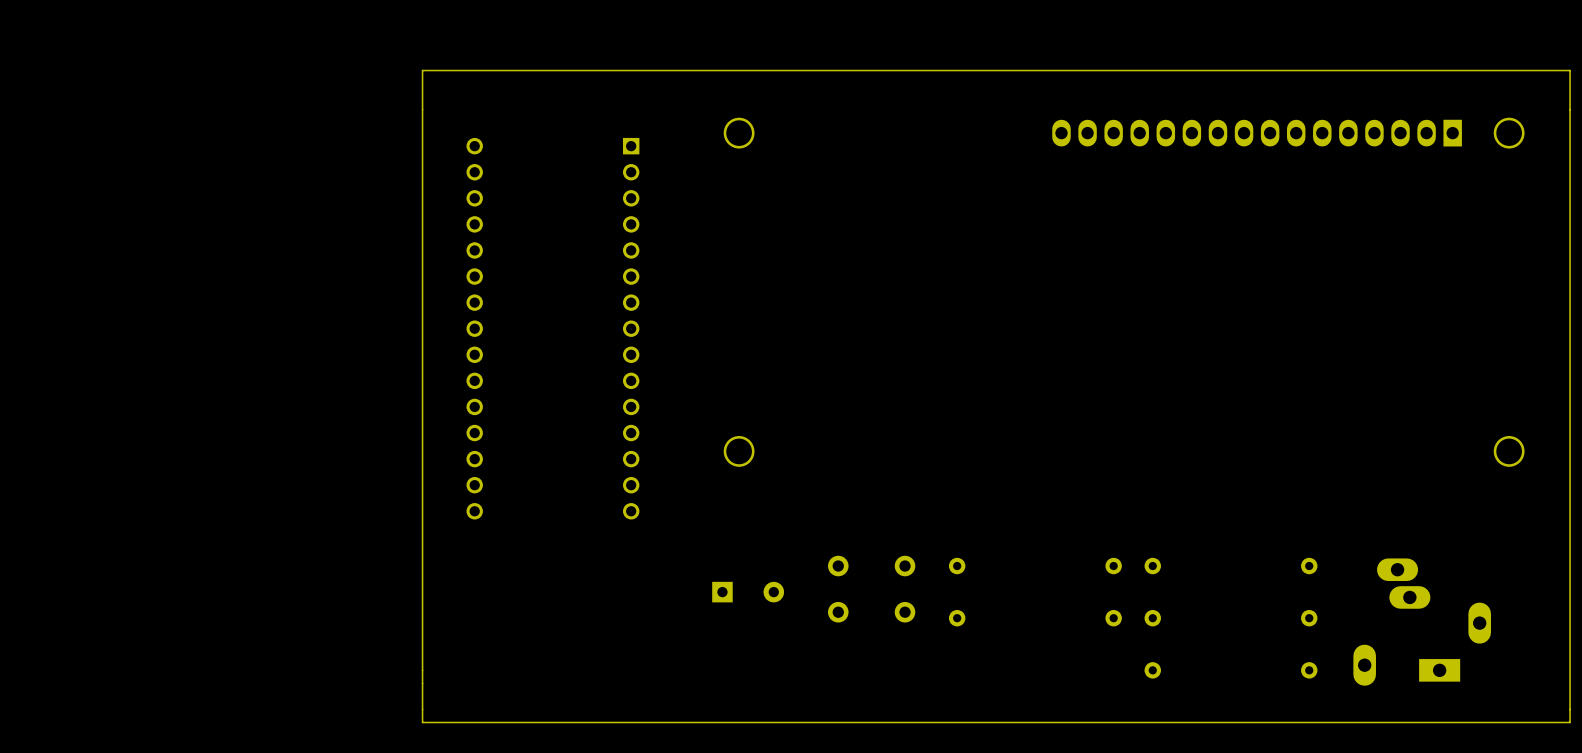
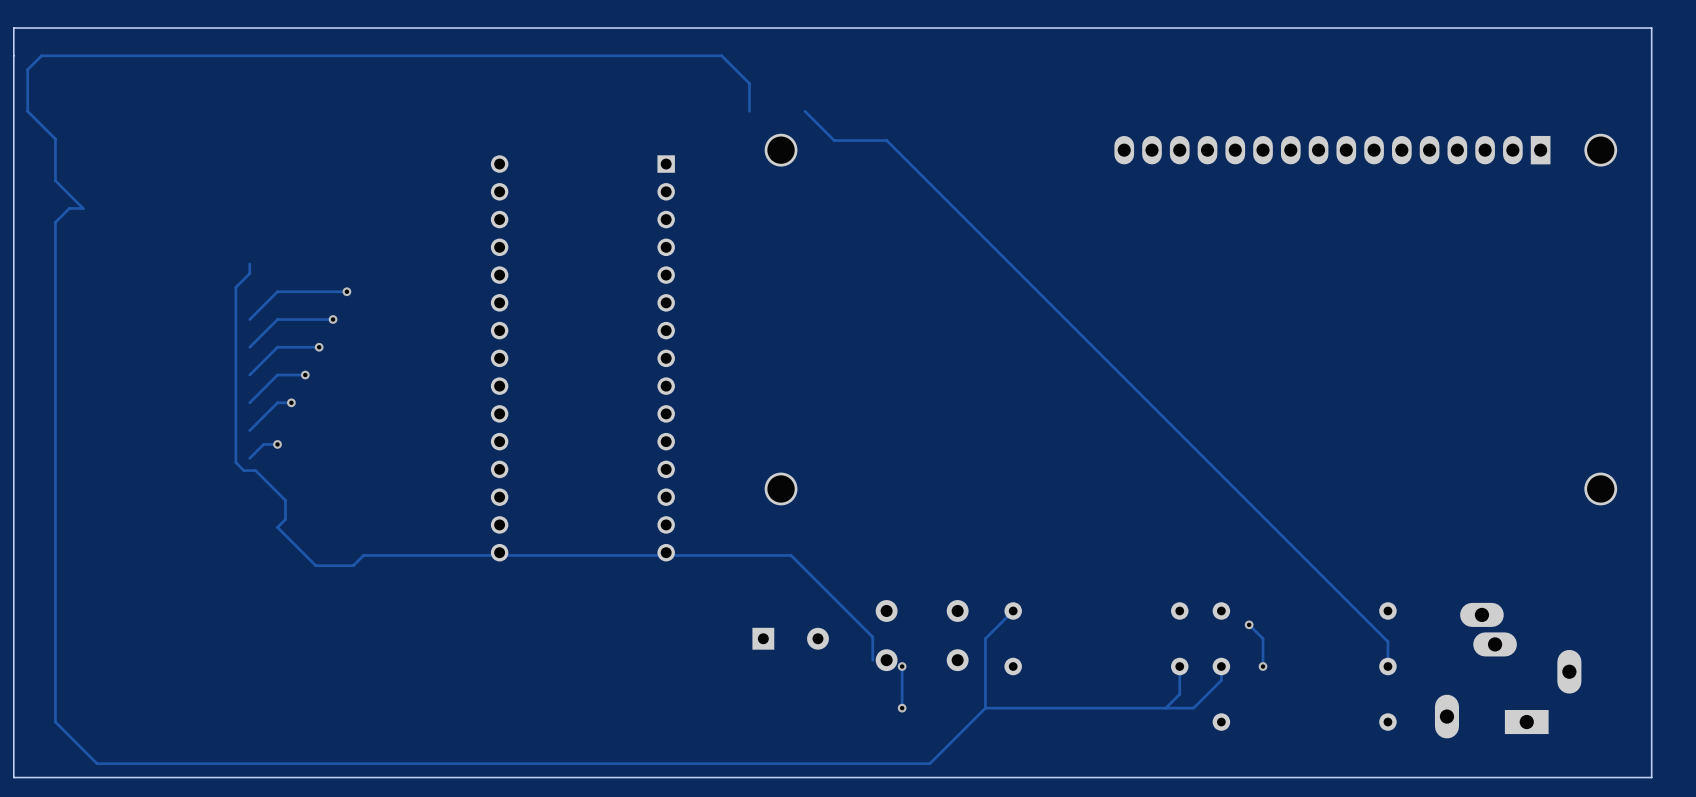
track: none -> (749, 111) (749, 83) (721, 55) (41, 55) (27, 69) (27, 111) (55, 139) (55, 180) (83, 208) (69, 208) (55, 222) (55, 722) (97, 763) (929, 763) (985, 708)
track: none -> (804, 111) (834, 140) (886, 140) (1387, 641) (1387, 666)
track: none -> (249, 263) (249, 273) (235, 287) (235, 462) (243, 470) (255, 470) (285, 500) (285, 519) (277, 527) (315, 565) (353, 565) (363, 555) (791, 555) (872, 637) (872, 660)
track: none -> (346, 291) (277, 291) (249, 319)
via: none -> (346, 291)
track: none -> (333, 319) (277, 319) (249, 347)
via: none -> (333, 319)
track: none -> (319, 347) (277, 347) (249, 375)
via: none -> (319, 347)
track: none -> (305, 375) (277, 375) (249, 402)
via: none -> (305, 375)
track: none -> (291, 402) (277, 402) (249, 430)
via: none -> (291, 402)
track: none -> (277, 444) (263, 444) (249, 458)
via: none -> (277, 444)
track: none -> (1013, 610) (985, 638) (985, 708)
track: none -> (1249, 624) (1263, 638) (1263, 666)
via: none -> (1249, 624)
track: none -> (902, 666) (902, 708)
via: none -> (902, 666)
track: none -> (1179, 666) (1179, 694) (1165, 708)
track: none -> (1221, 666) (1221, 680) (1193, 708) (985, 708)
via: none -> (1263, 666)
via: none -> (902, 708)
board edge: (1557, 722) (1570, 722) (1570, 70) (422, 70) (422, 722) -> (1651, 777) (1651, 28) (13, 28) (13, 777) (444, 777)

